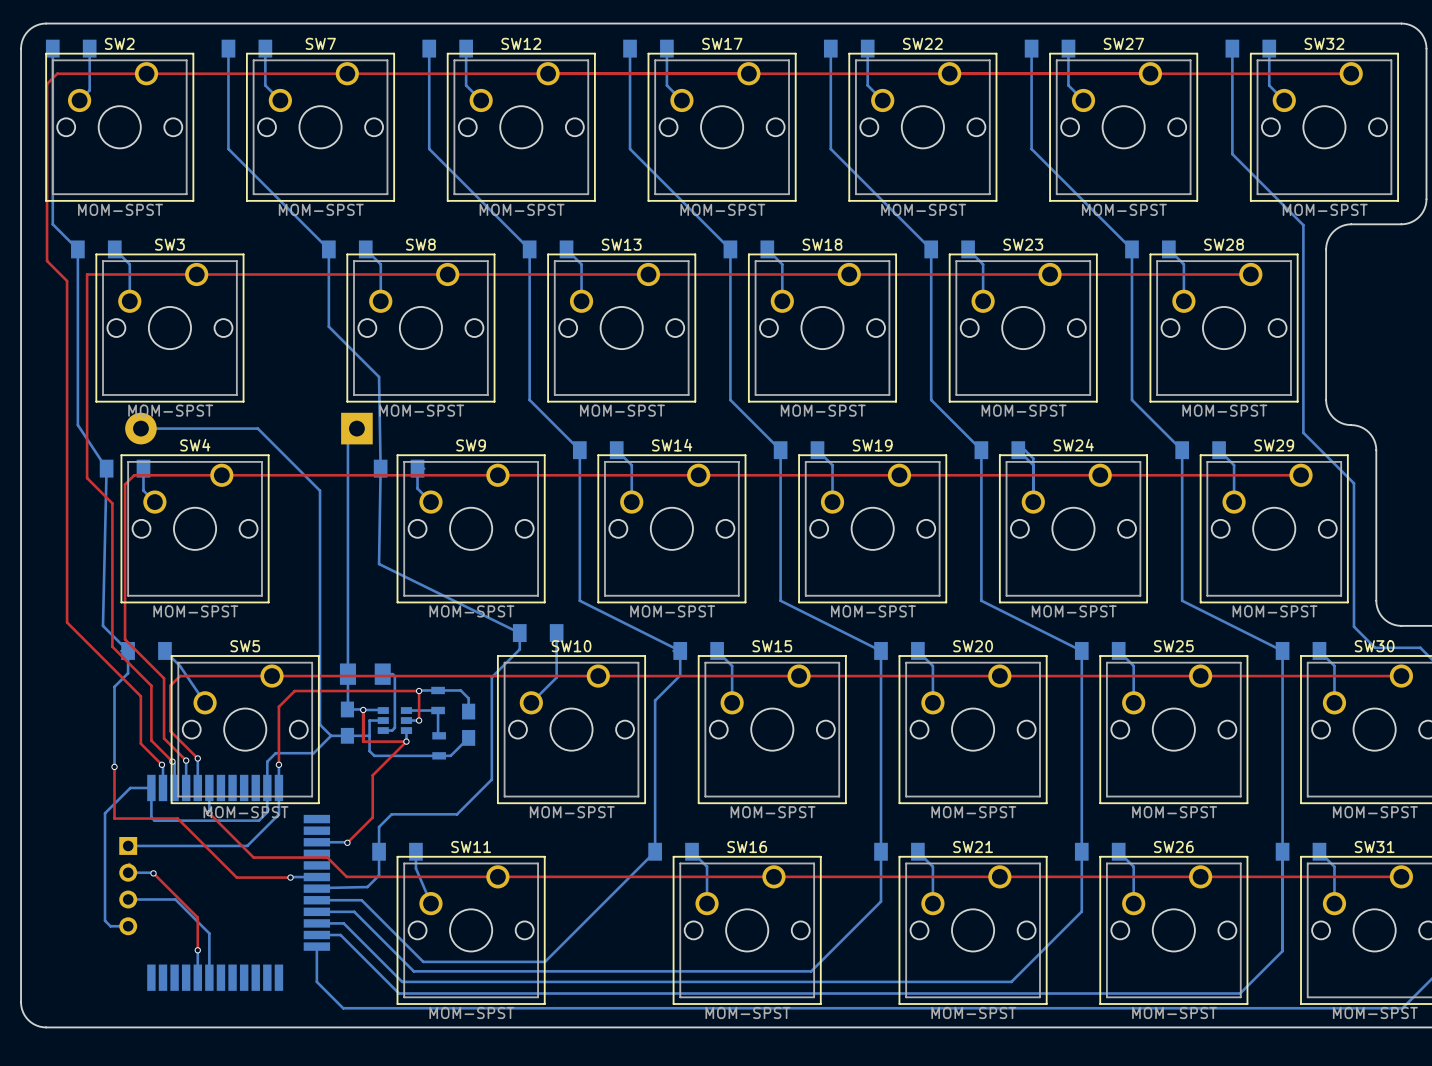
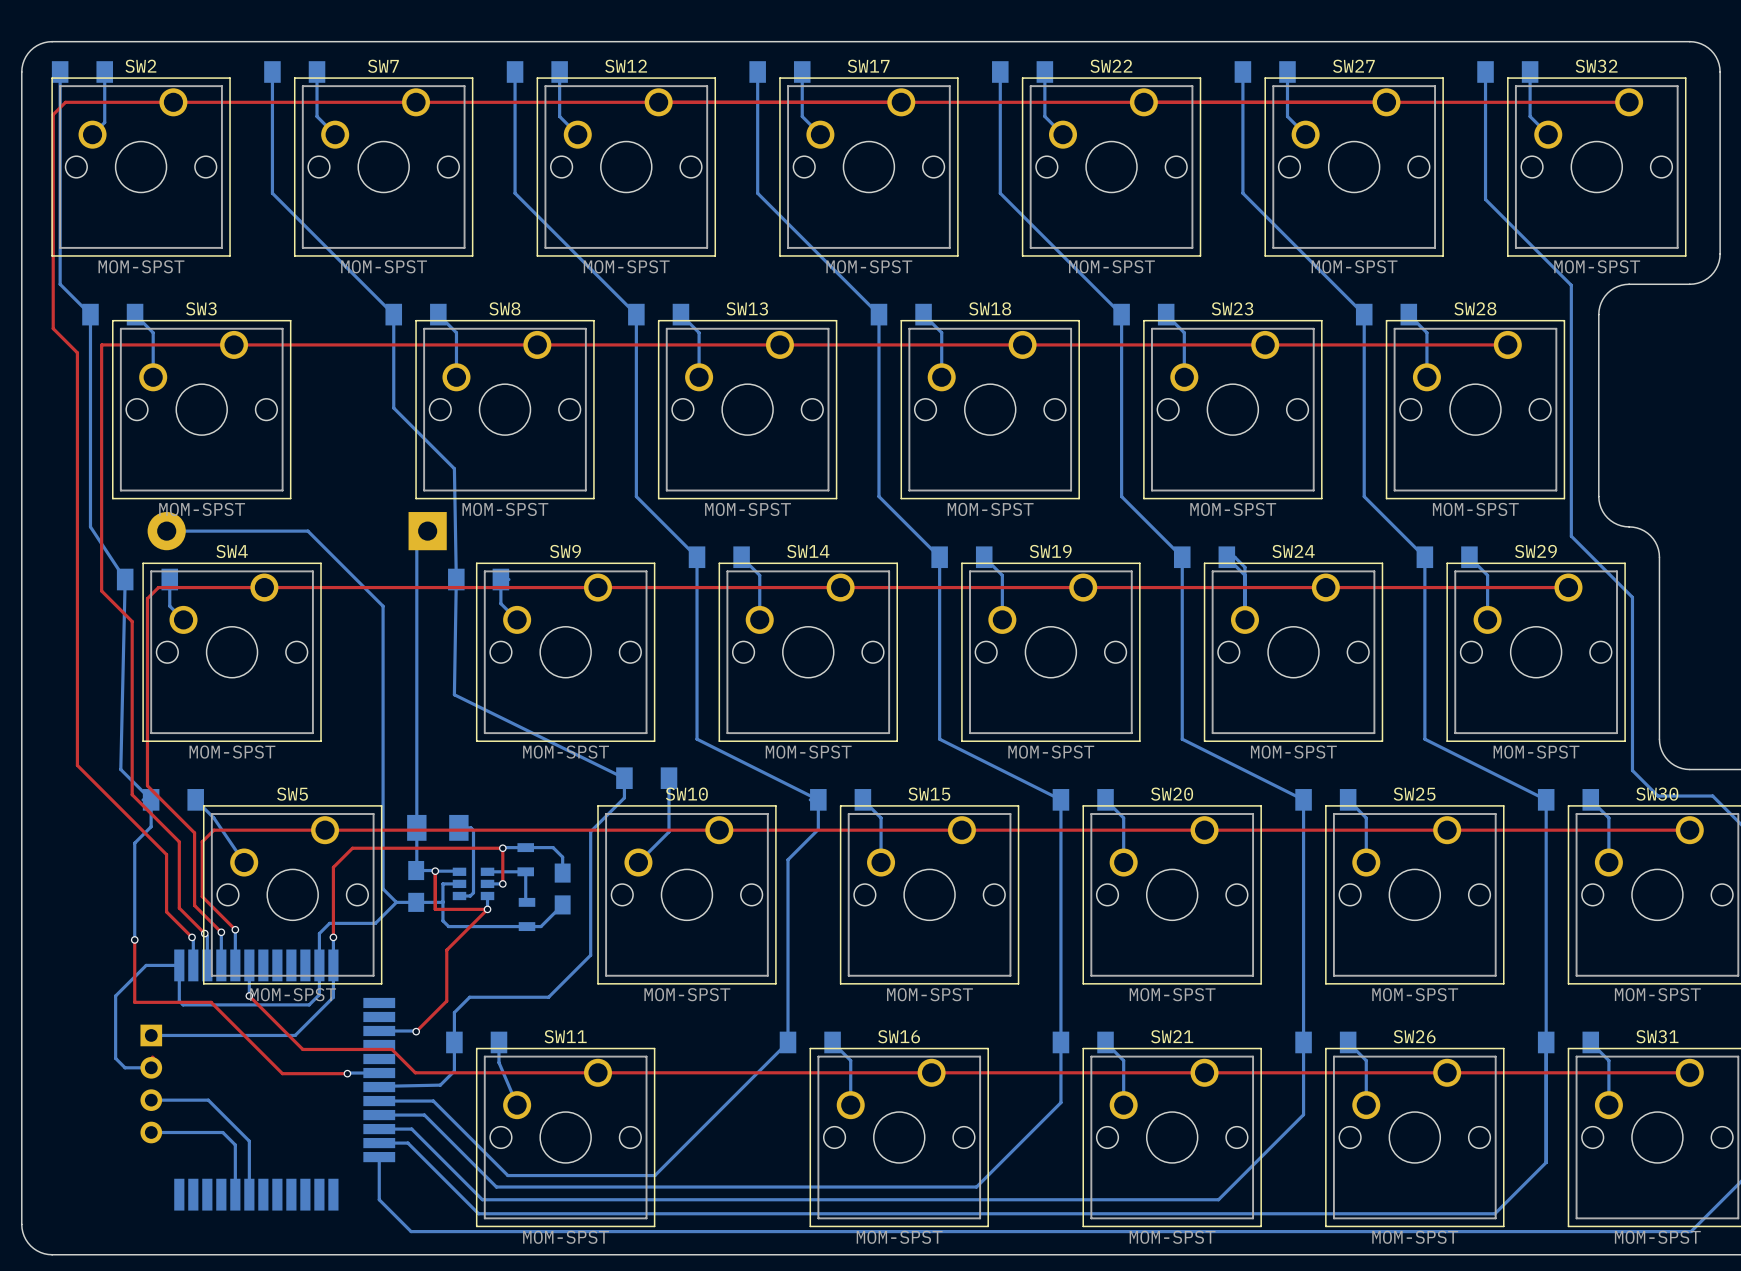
bottom track: (130, 787) (105, 813) (105, 920) (110, 926) (128, 926) -> (153, 965) (146, 965) (115, 995) (115, 1058) (125, 1067) (151, 1067)
bottom track: (128, 872) (153, 873) -> none
top track: (153, 873) (197, 917) (197, 950) -> none
via: (153, 873) -> none
bottom track: none -> (151, 1132) (222, 1132) (235, 1144) (235, 1161)
via: (197, 950) -> none

